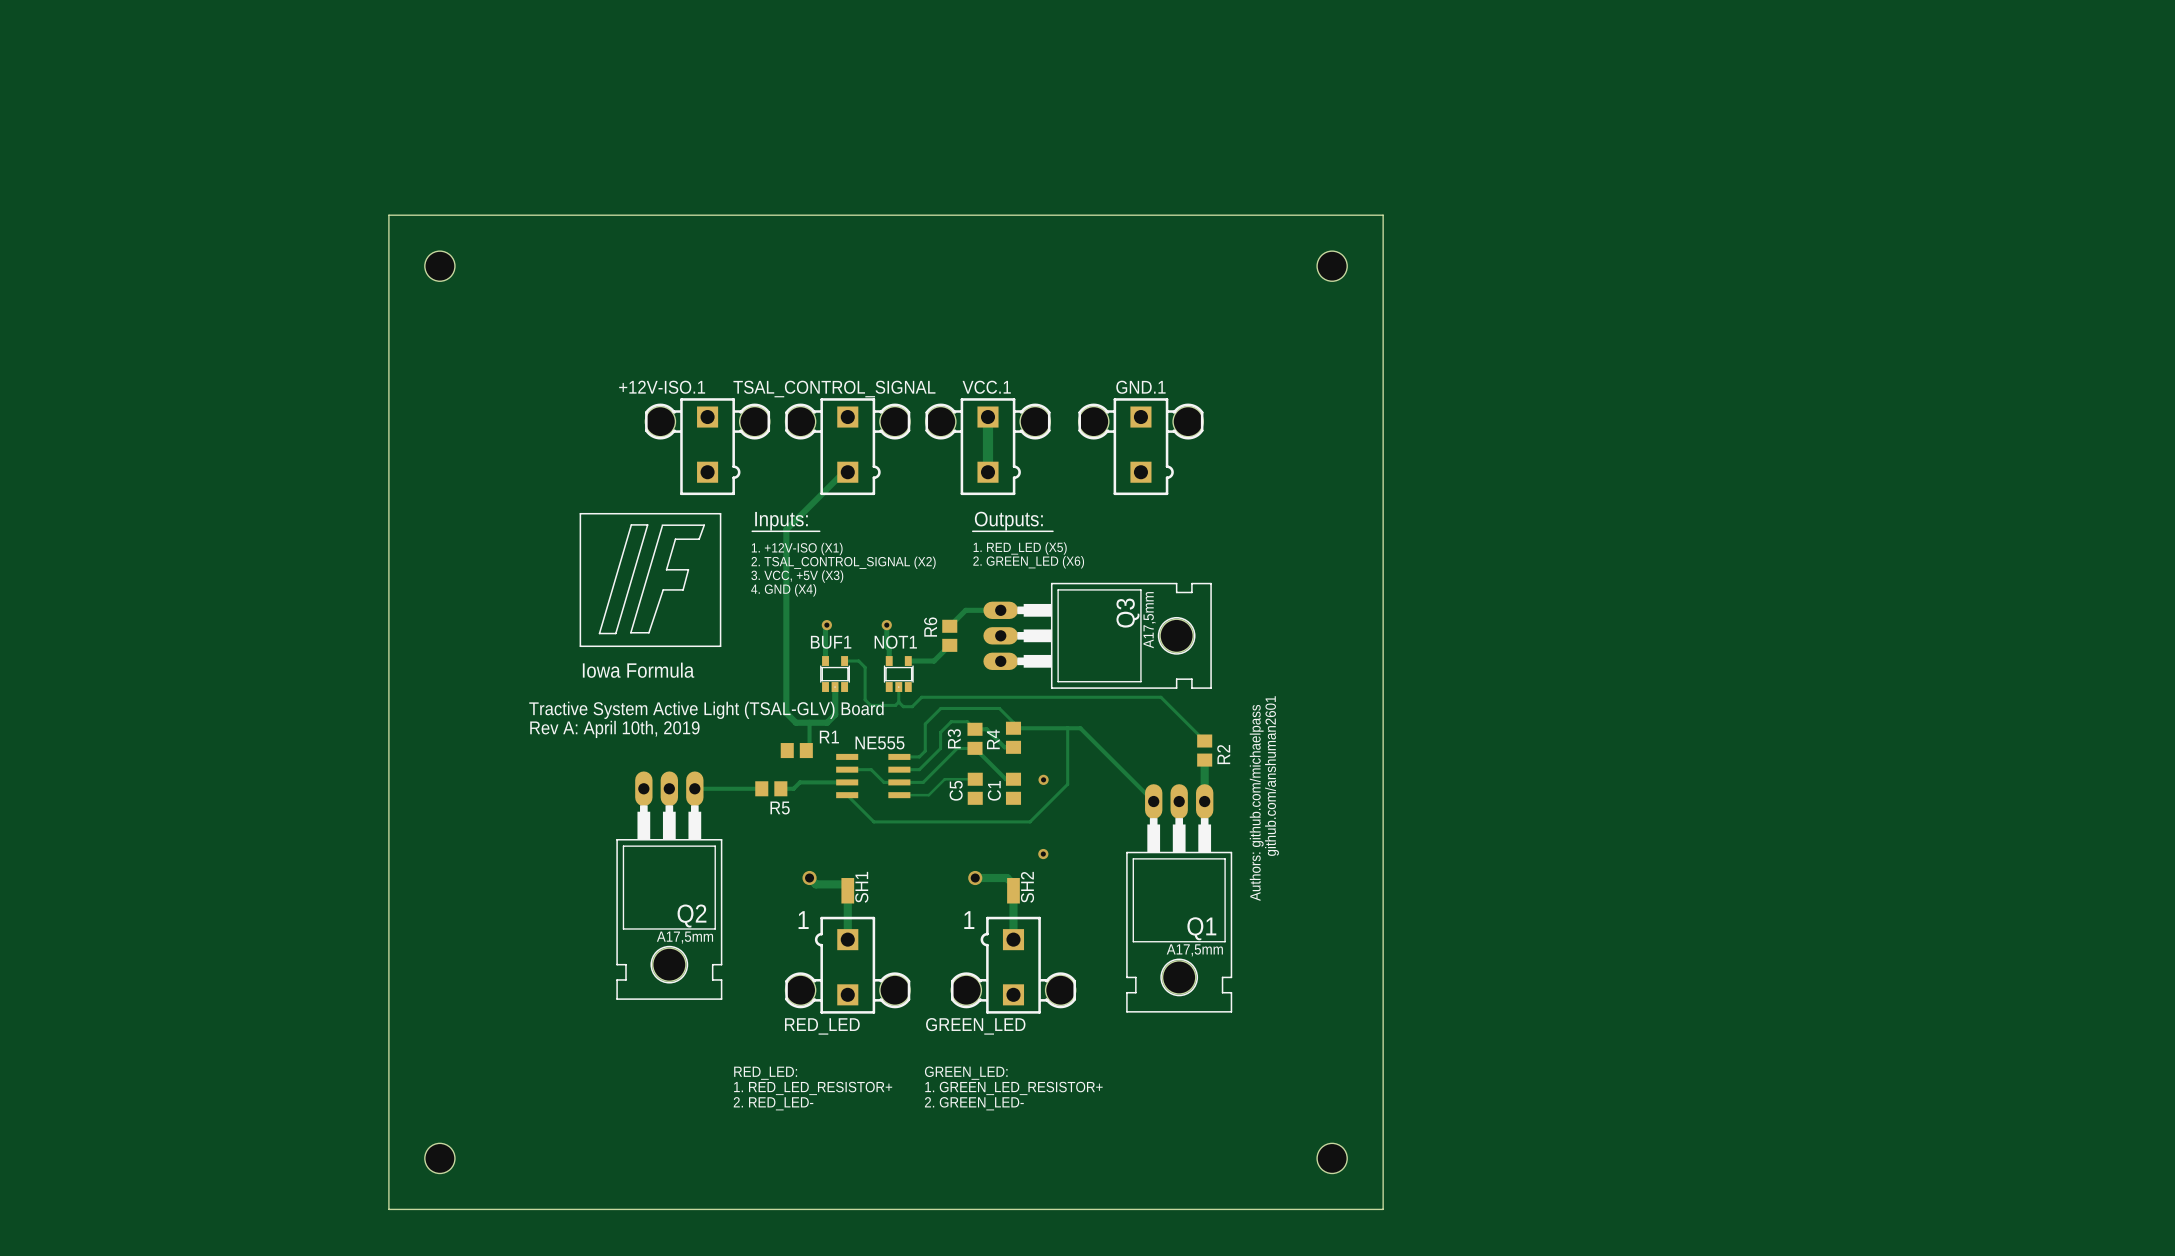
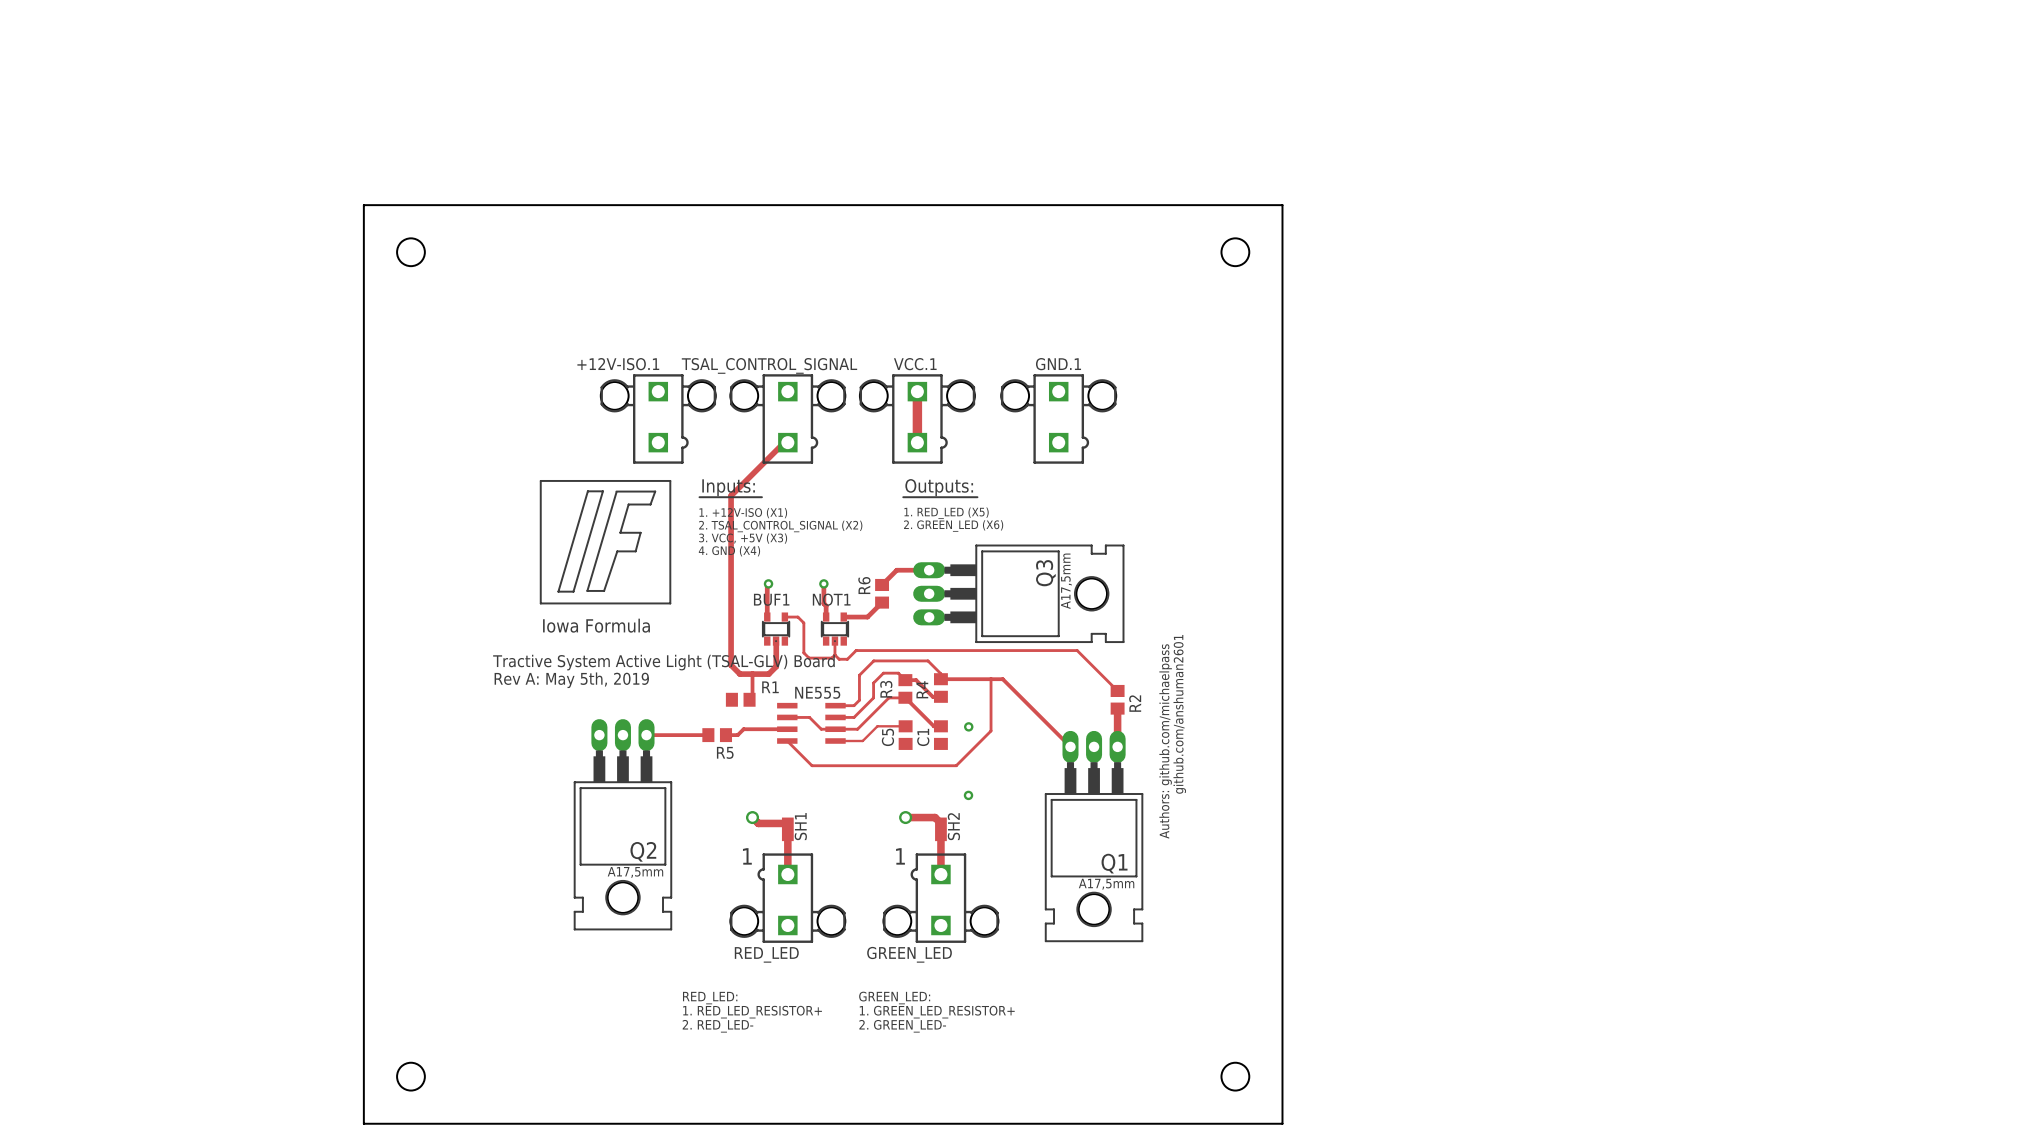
text: Rev A: April 10th, 2019 (614, 729) -> Rev A: May 5th, 2019 (571, 680)

